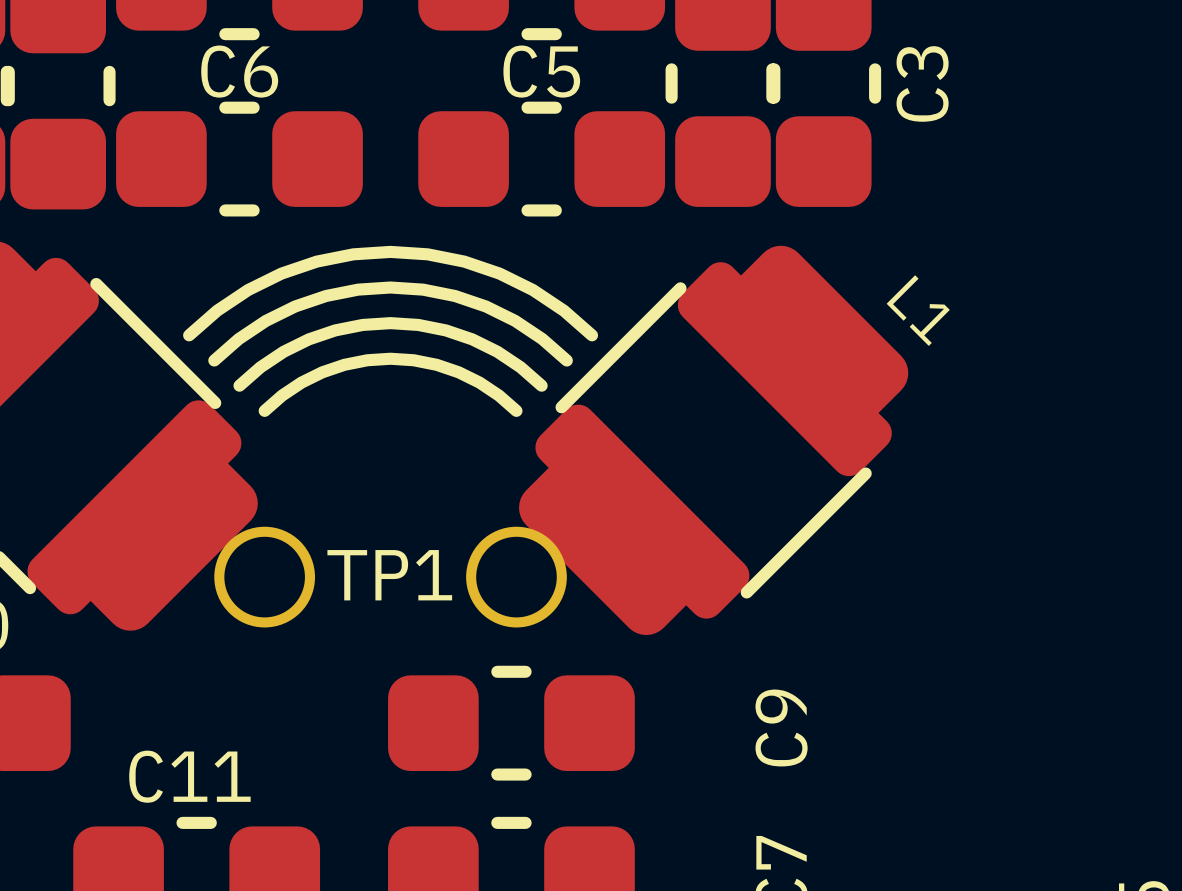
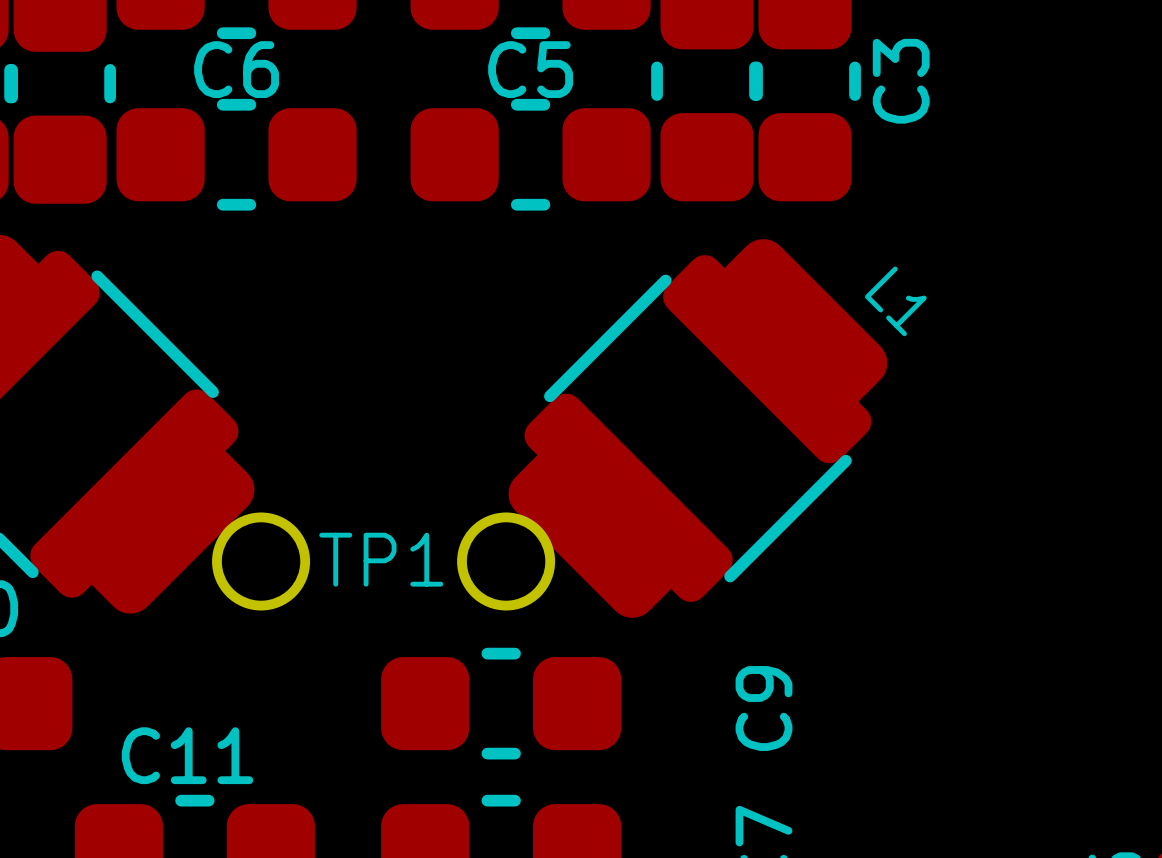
line: (189, 335) (217, 310) (248, 290) (281, 273) (316, 261) (353, 254) (390, 251) (427, 254) (464, 261) (499, 273) (533, 290) (564, 310) (592, 335) -> none
line: (214, 360) (238, 339) (265, 320) (295, 306) (326, 296) (358, 289) (390, 287) (423, 289) (455, 296) (485, 306) (515, 320) (542, 339) (566, 360) -> none
line: (239, 385) (260, 367) (283, 351) (308, 339) (335, 330) (362, 324) (390, 323) (418, 324) (445, 330) (472, 339) (497, 351) (520, 367) (541, 385) -> none
line: (264, 410) (282, 395) (301, 382) (322, 372) (344, 364) (367, 360) (390, 358) (413, 360) (436, 364) (458, 372) (479, 382) (498, 395) (516, 410) -> none

